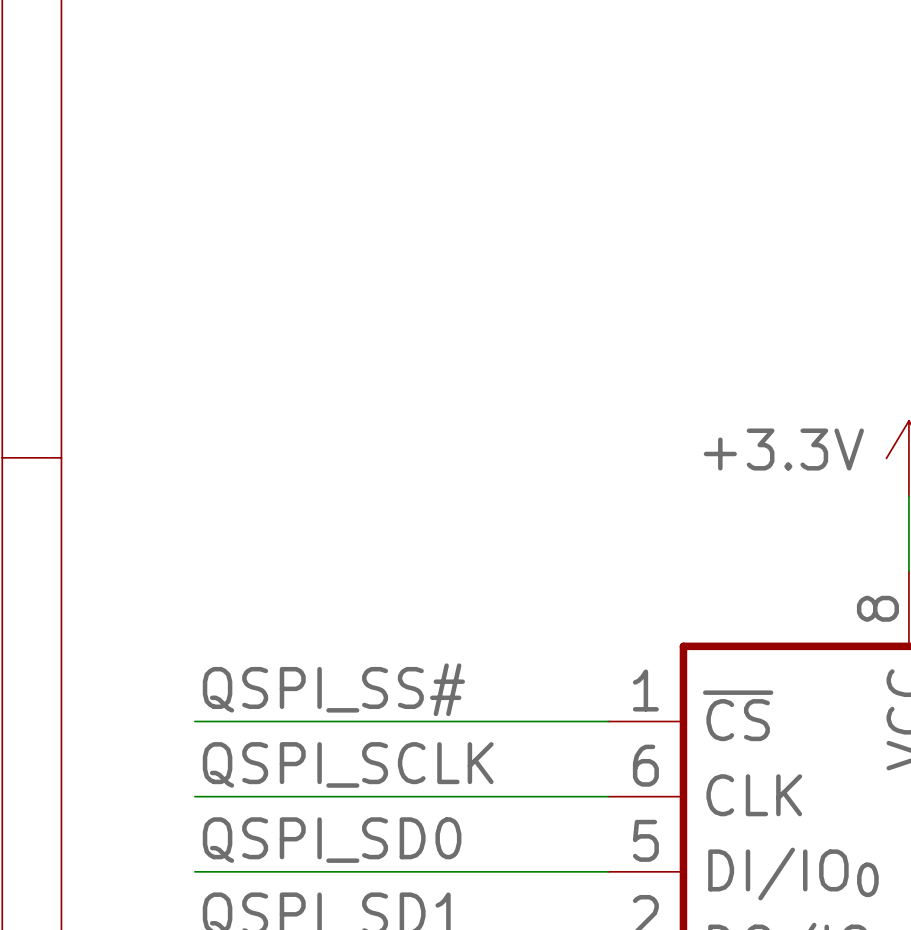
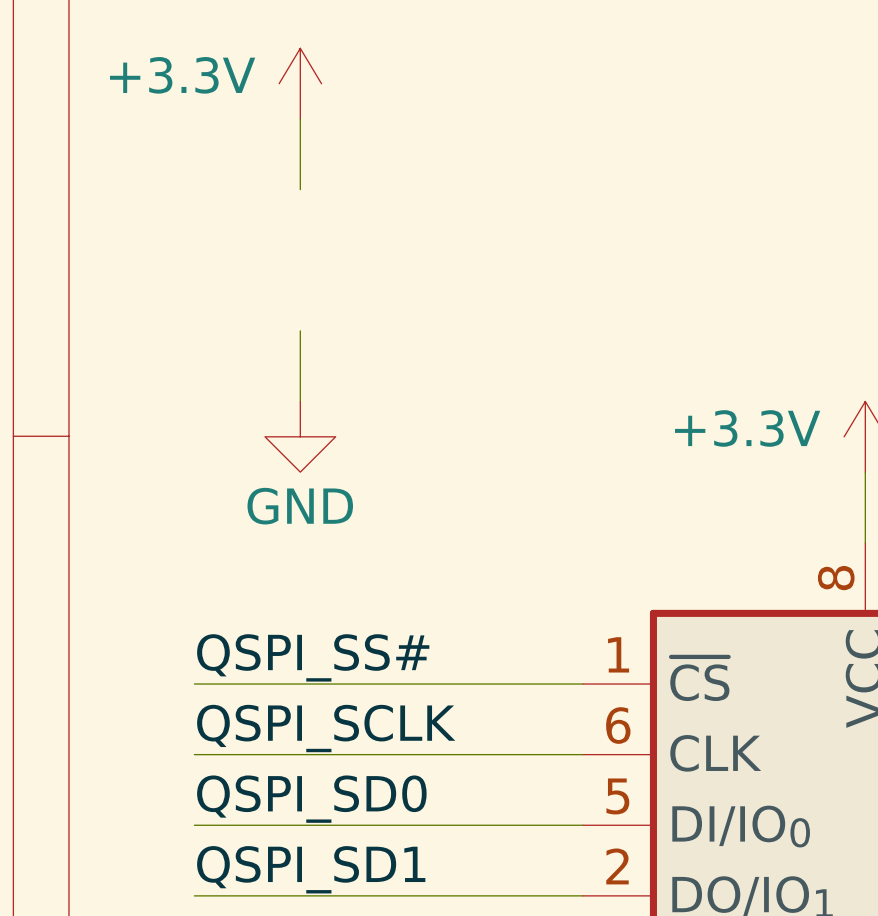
power symbol: none -> +3.3V (300, 83)
wire: none -> (300, 119) (300, 189)
wire: none -> (300, 330) (300, 401)
power symbol: none -> GND (300, 436)

